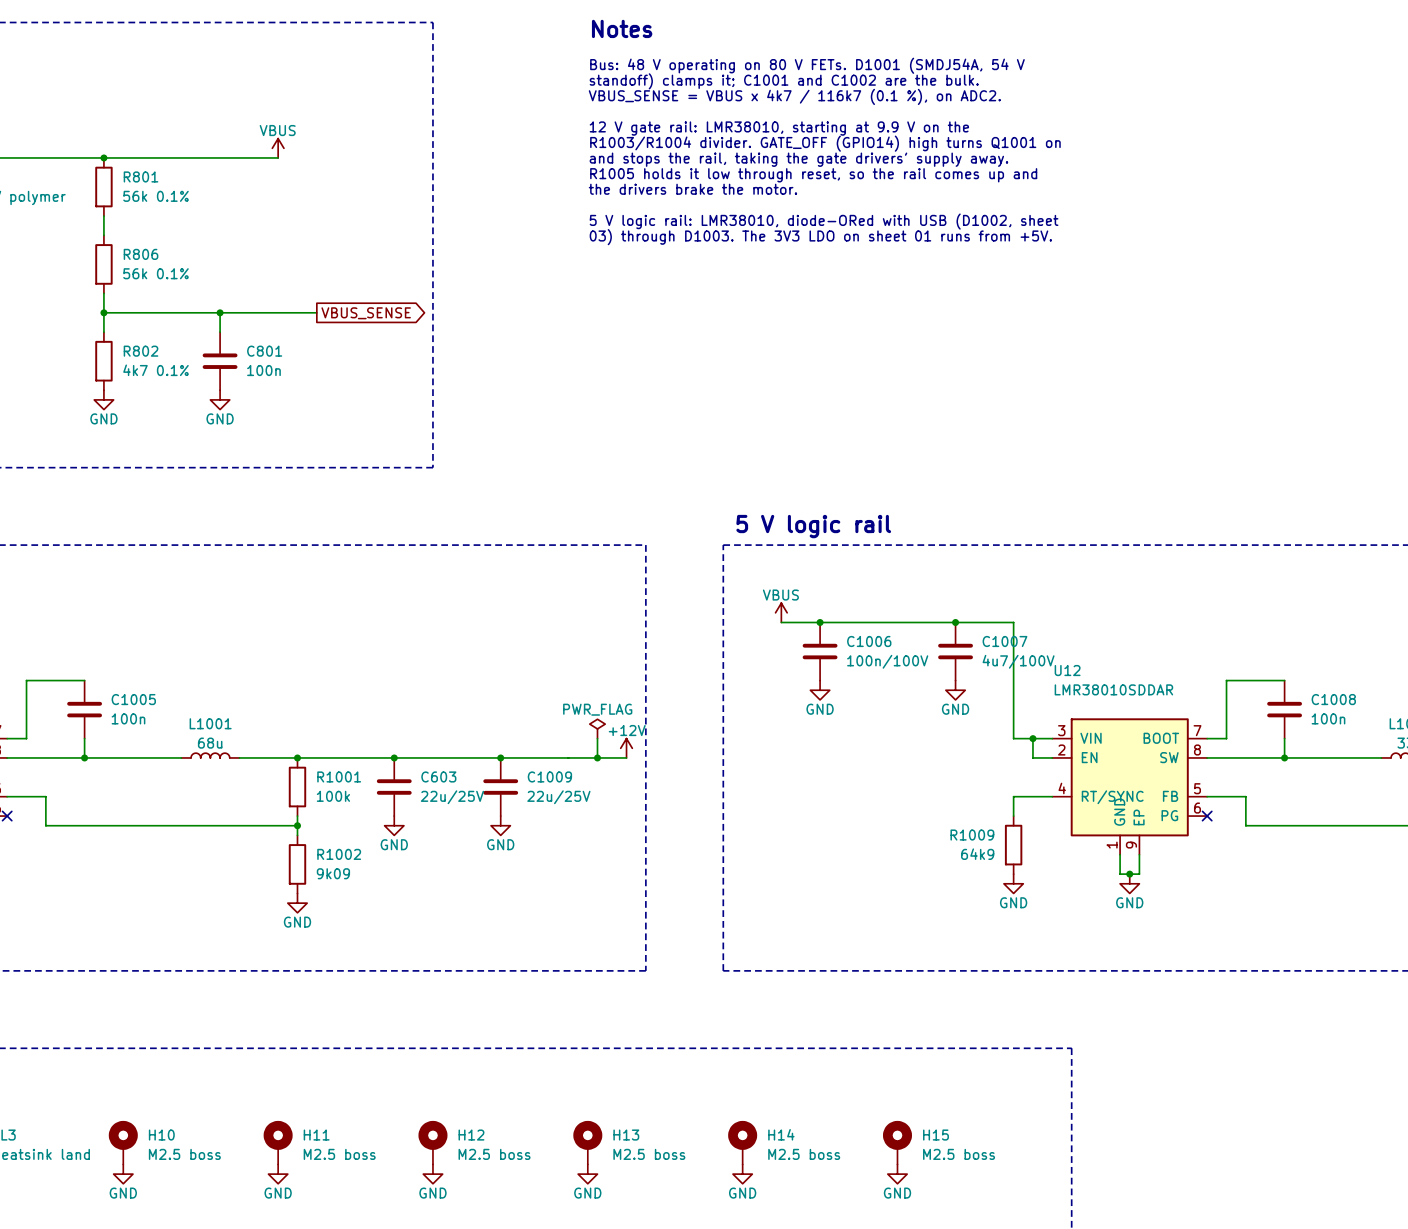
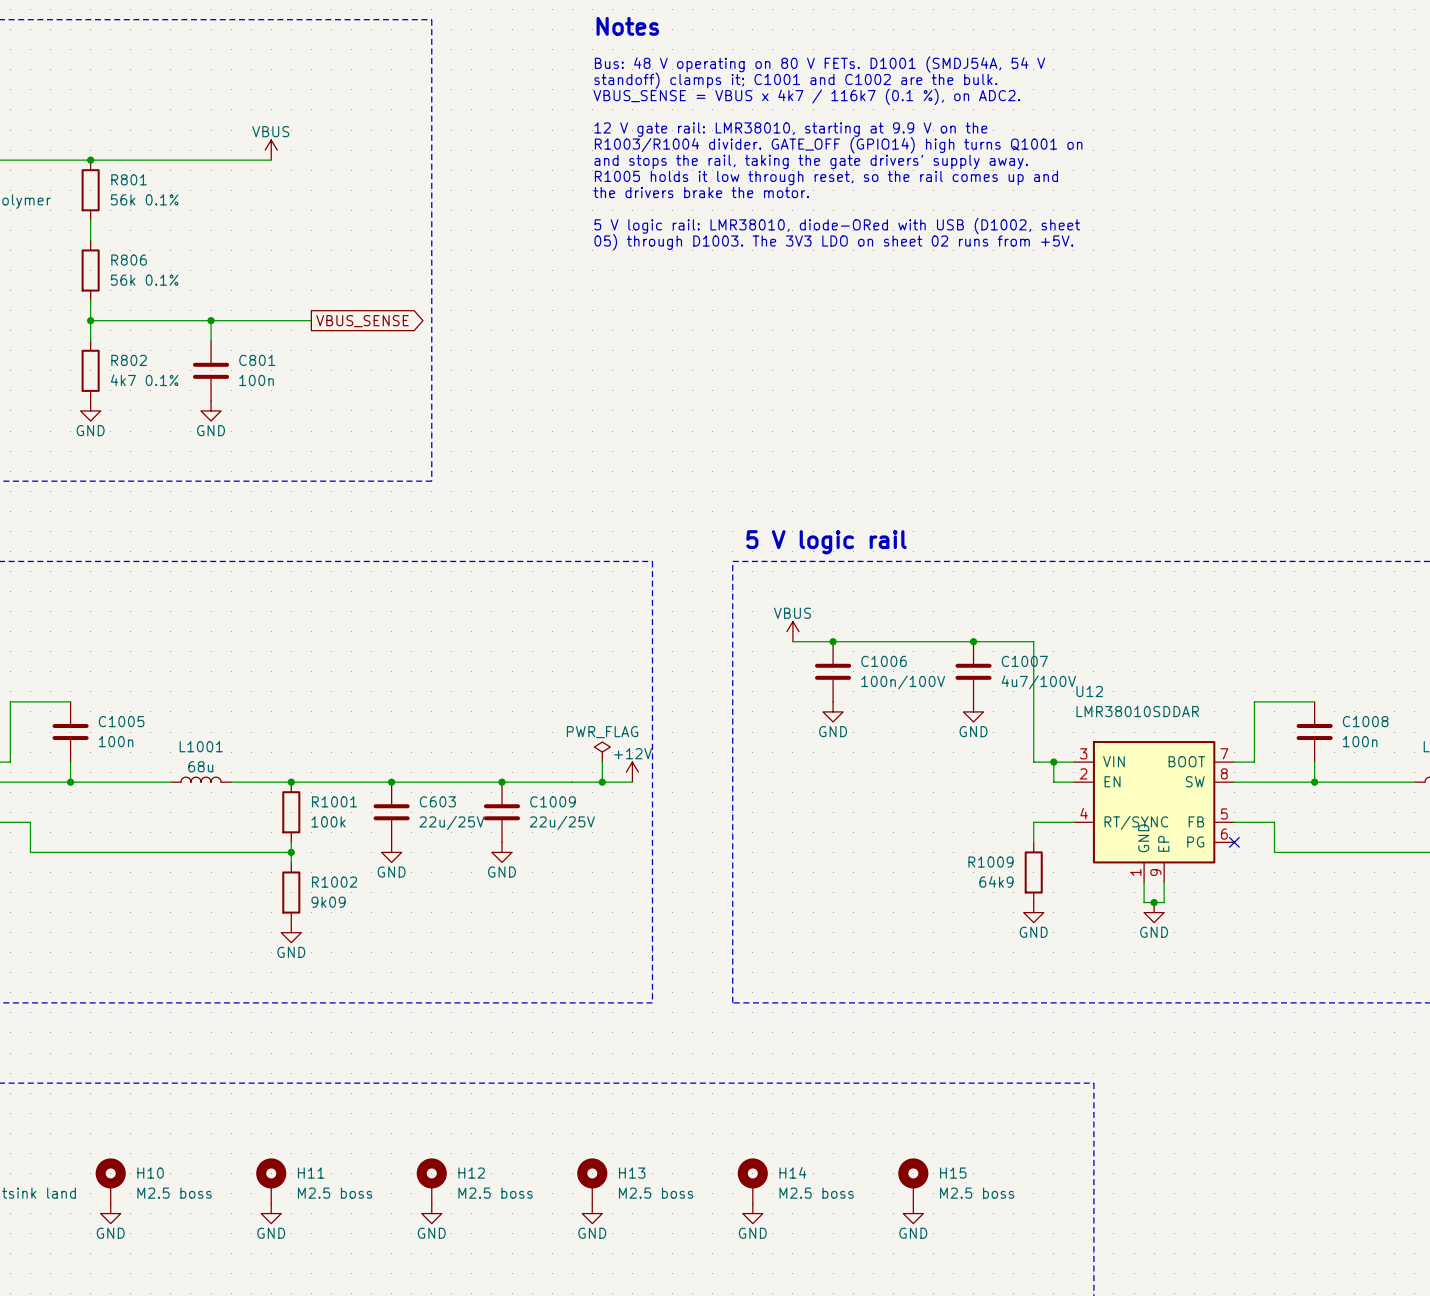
text: 03) through D1003. The 3V3 LDO on sheet 01 runs from +5V. (820, 237) -> 05) through D1003. The 3V3 LDO on sheet 02 runs from +5V. (833, 242)

